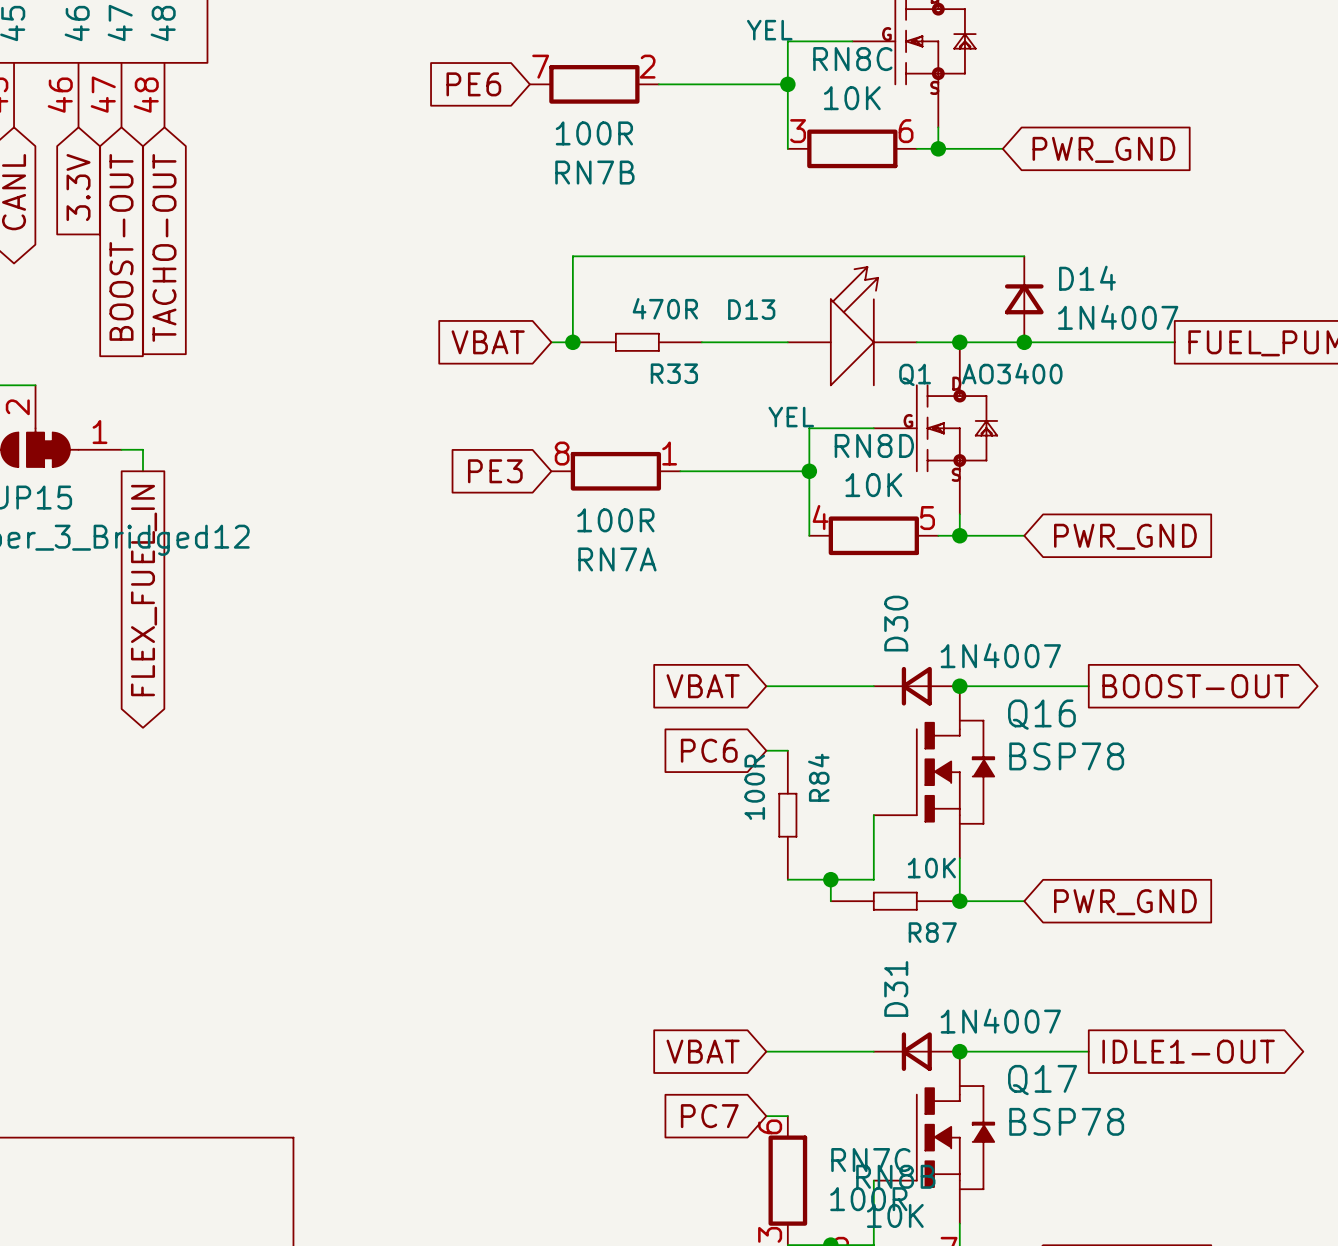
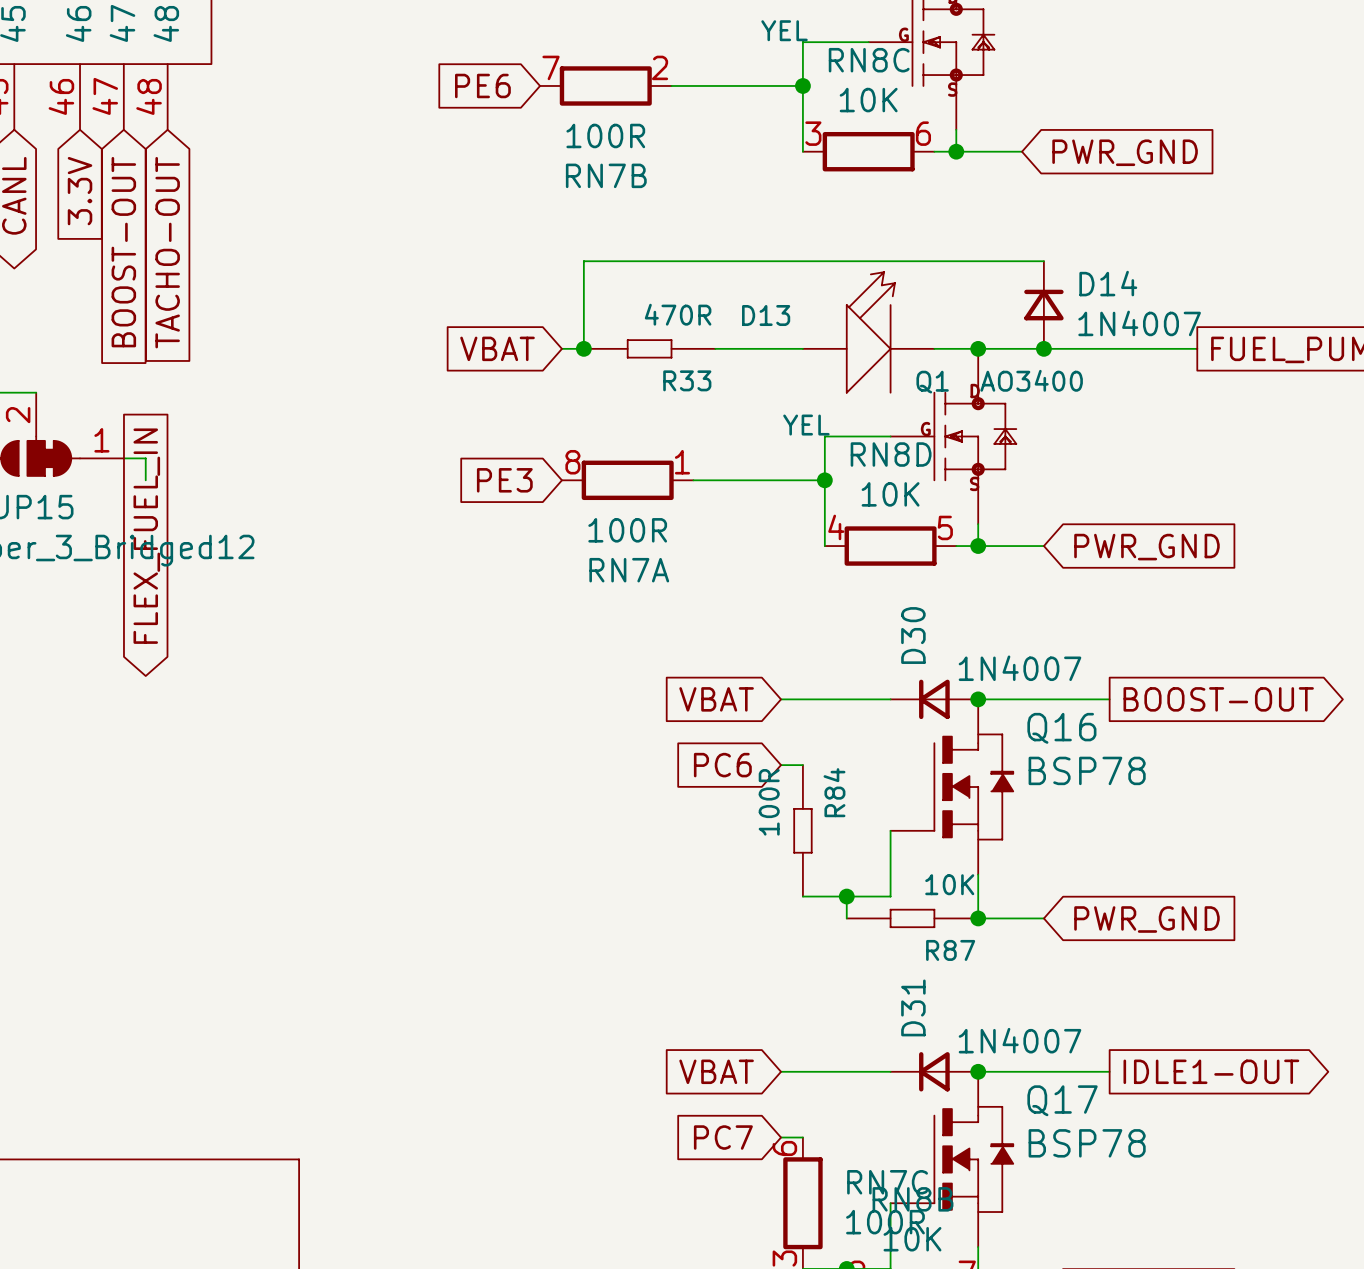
global label position: FLEX_FUEL_IN (144, 590) -> FLEX_FUEL_IN (146, 536)

